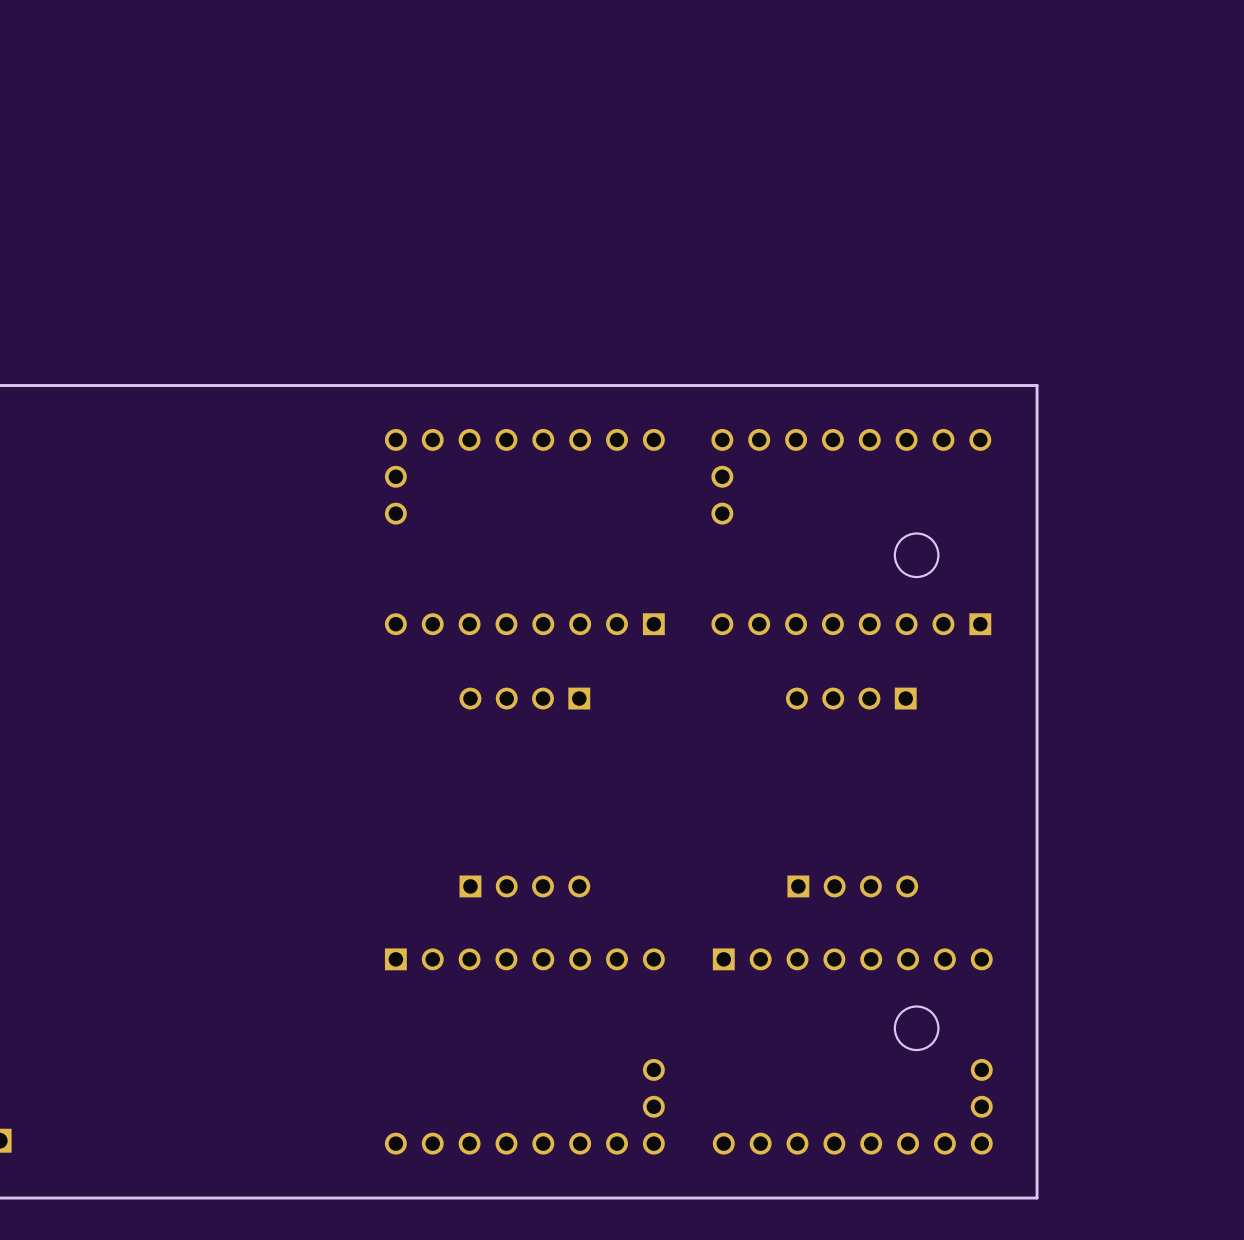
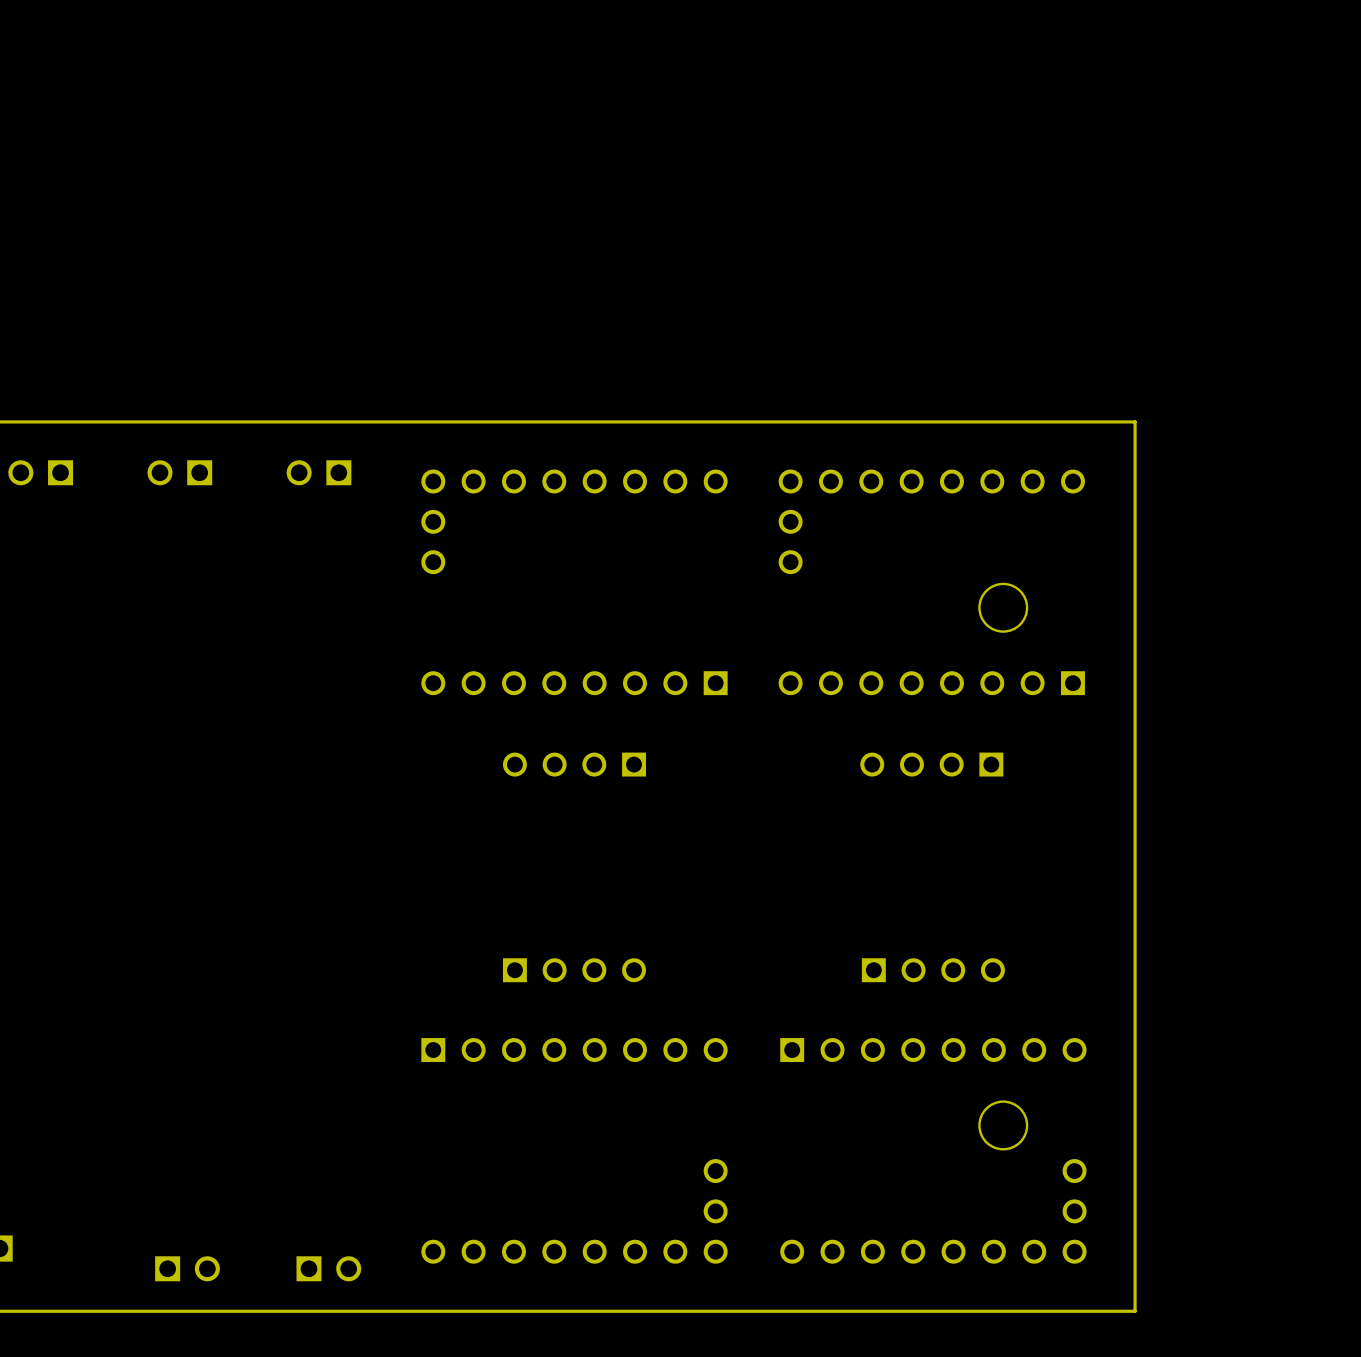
part: none -> (40, 472)
part: none -> (179, 472)
part: none -> (319, 472)
part: none -> (187, 1268)
part: none -> (328, 1268)

